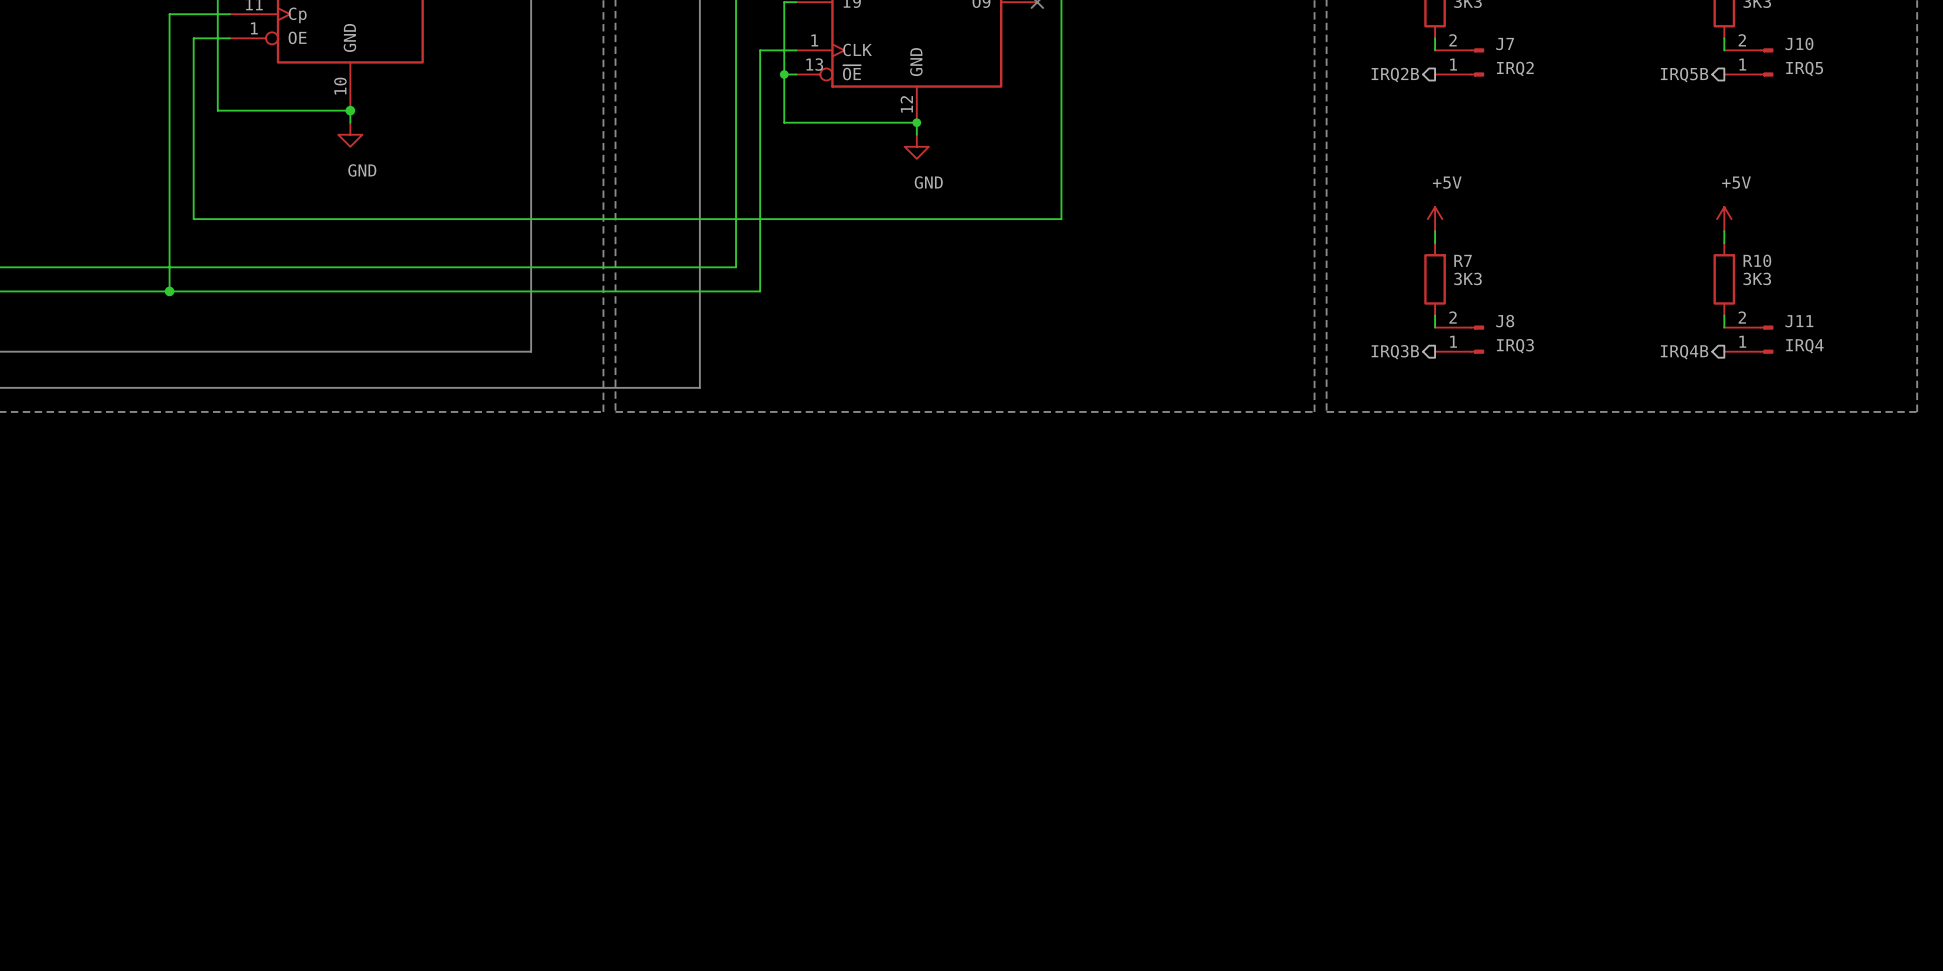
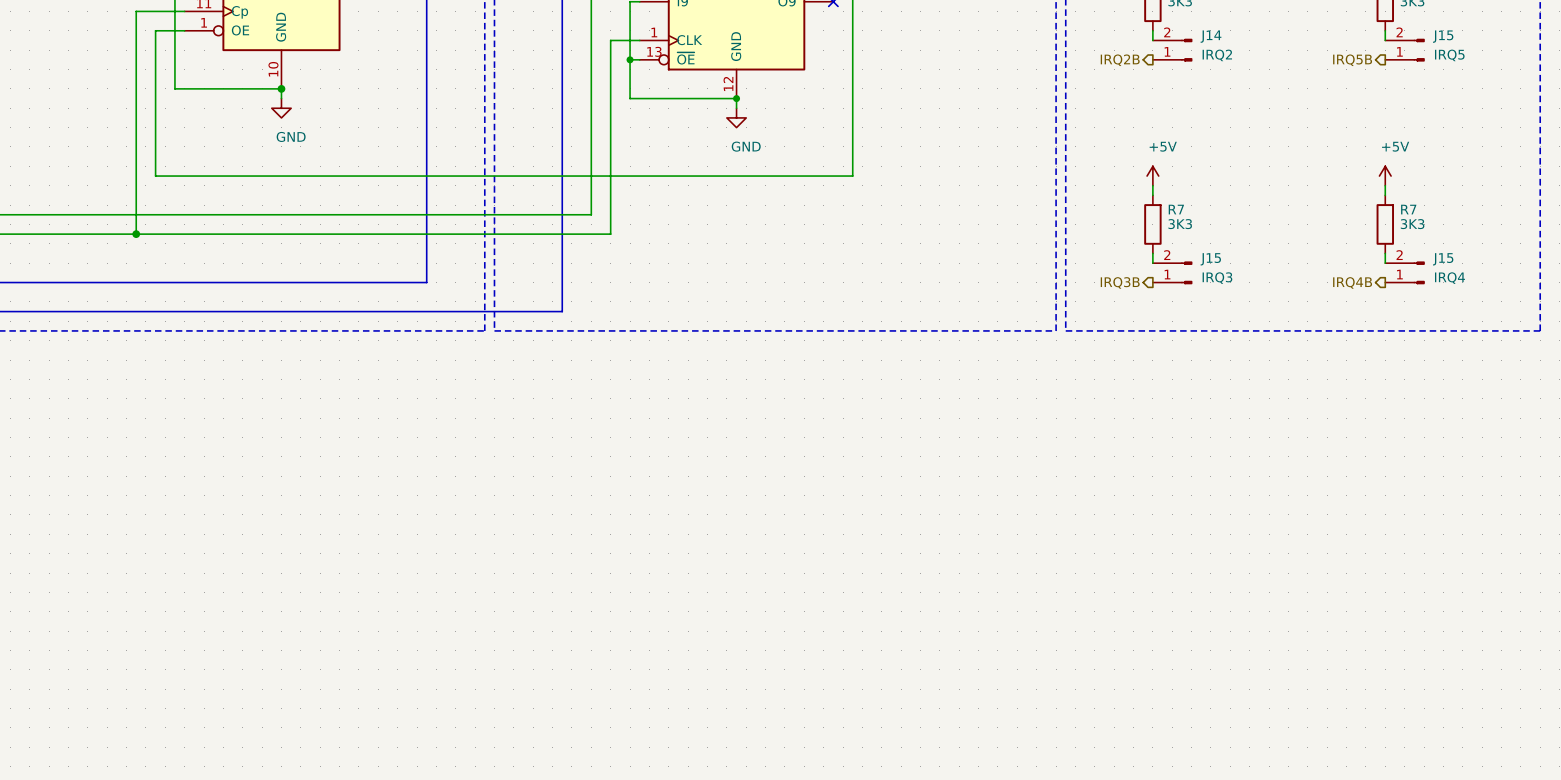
J10 name: J10 (1799, 43) -> J15 (1443, 36)
J7 name: J7 (1505, 44) -> J14 (1211, 36)
R10 name: R10 (1757, 260) -> R7 (1408, 209)
J8 name: J8 (1505, 321) -> J15 (1210, 259)
J11 name: J11 (1799, 321) -> J15 (1443, 259)

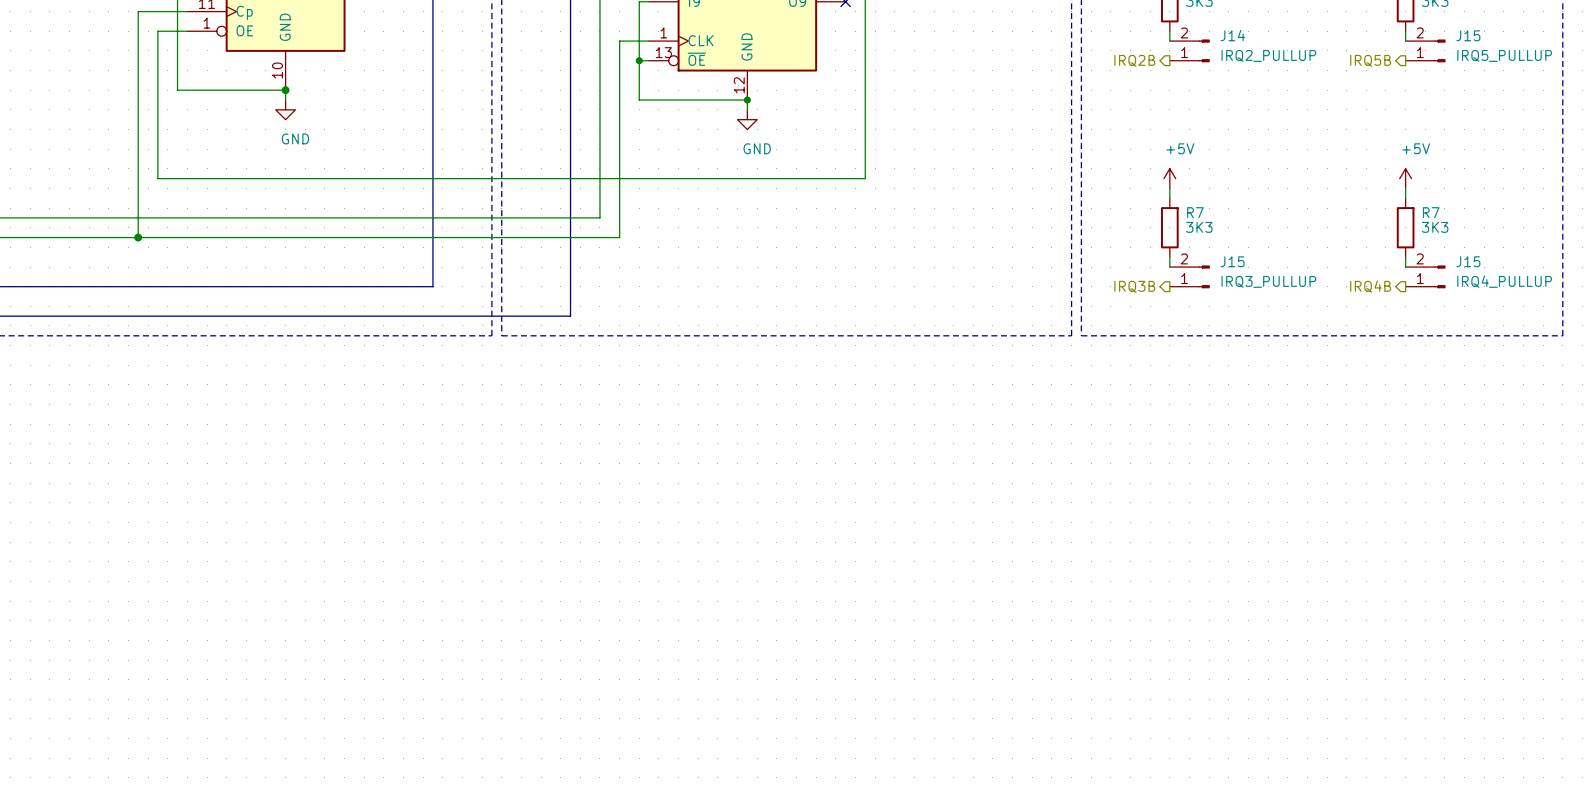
J14 value: IRQ2 (1217, 55) -> IRQ2_PULLUP (1268, 55)
J15 value: IRQ5 (1449, 55) -> IRQ5_PULLUP (1504, 55)
J15 value: IRQ3 (1217, 278) -> IRQ3_PULLUP (1268, 281)
J15 value: IRQ4 (1449, 278) -> IRQ4_PULLUP (1504, 281)

